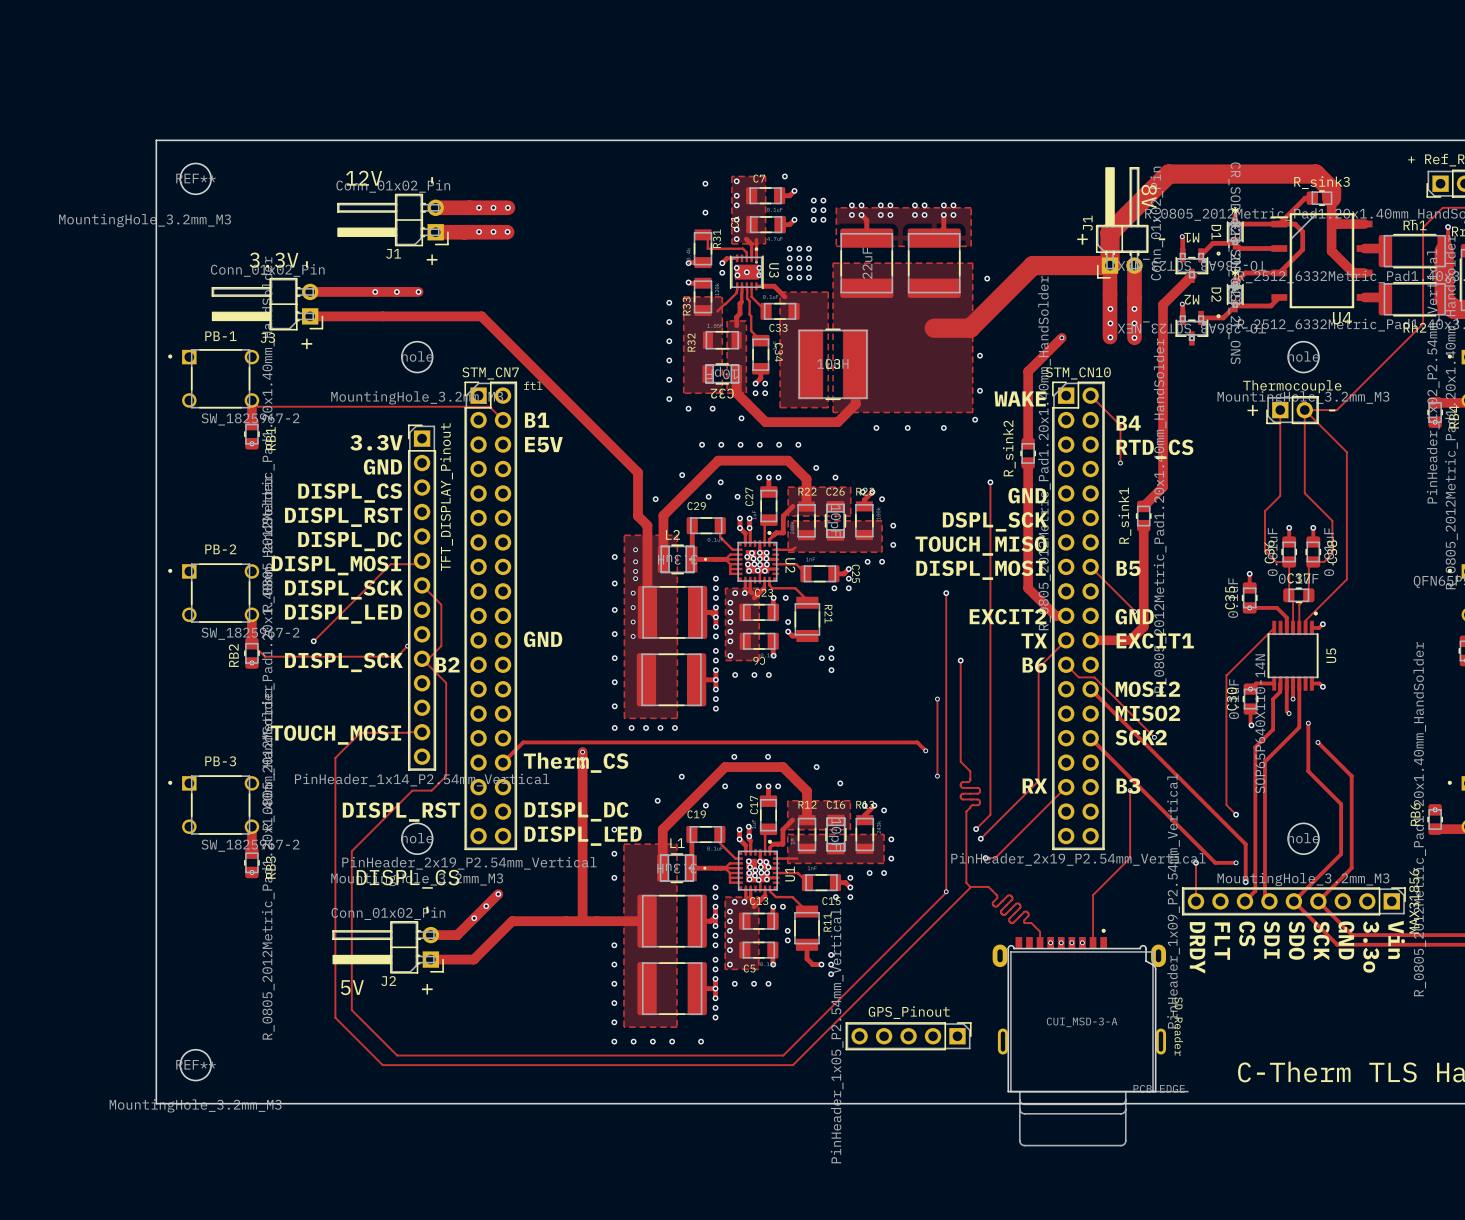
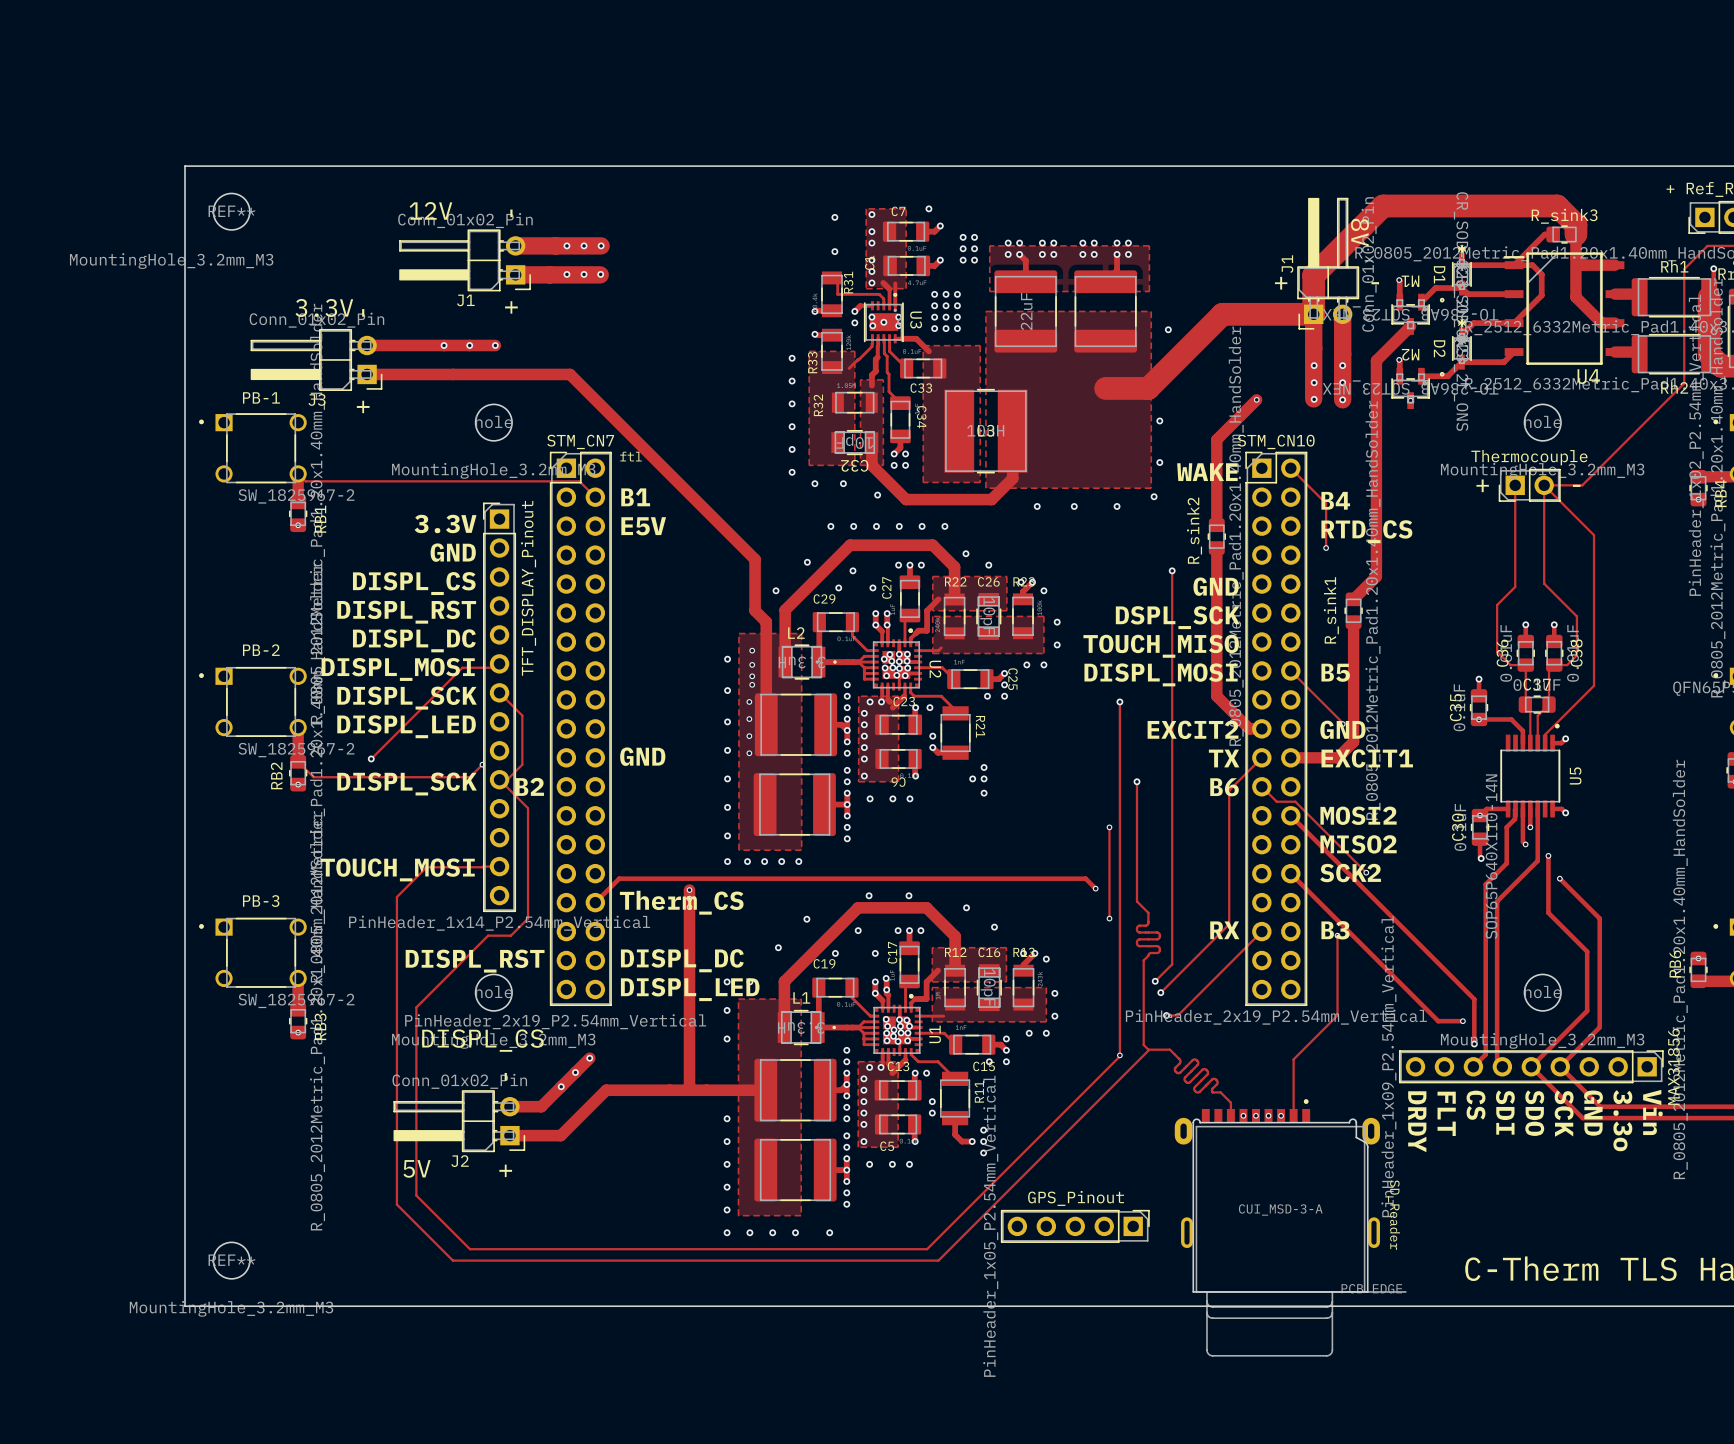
track: (1274, 627) (1226, 674) (1226, 805) (1236, 814) -> none
via: (1236, 814) -> none
track: (1196, 862) (1196, 901) -> none
via: (1196, 862) -> none

